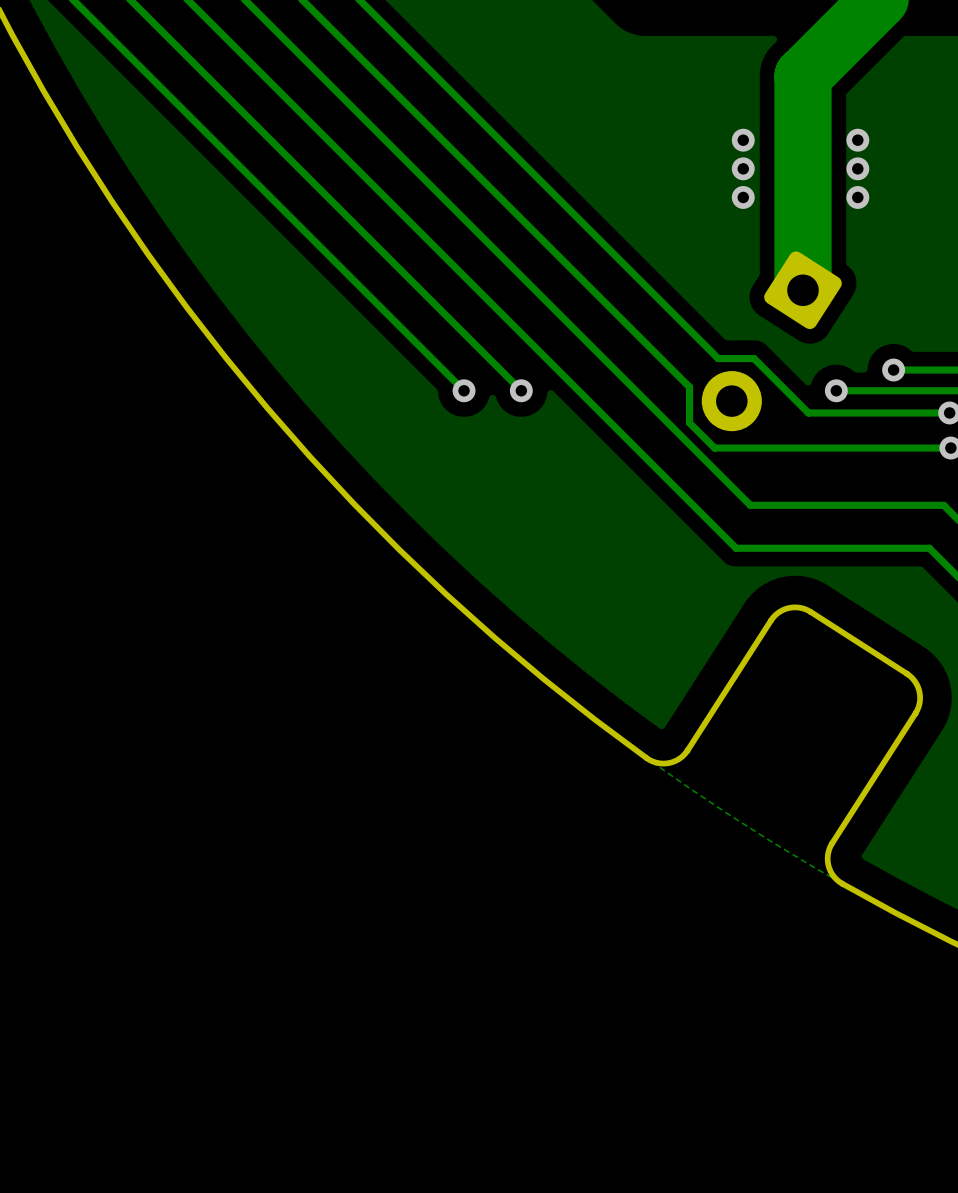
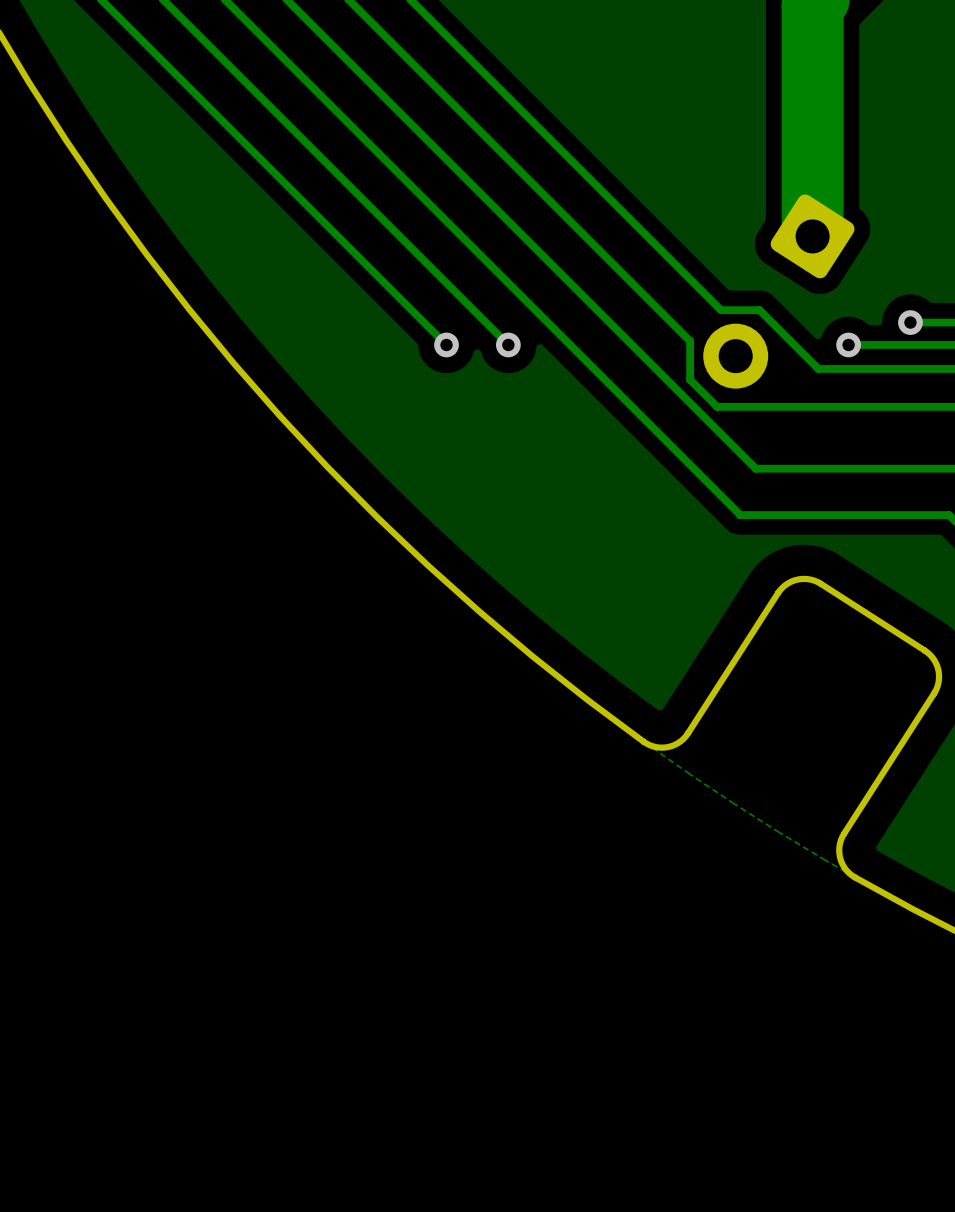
via: (743, 140) -> none
via: (857, 140) -> none
via: (743, 168) -> none
via: (857, 168) -> none
via: (743, 197) -> none
via: (857, 197) -> none

